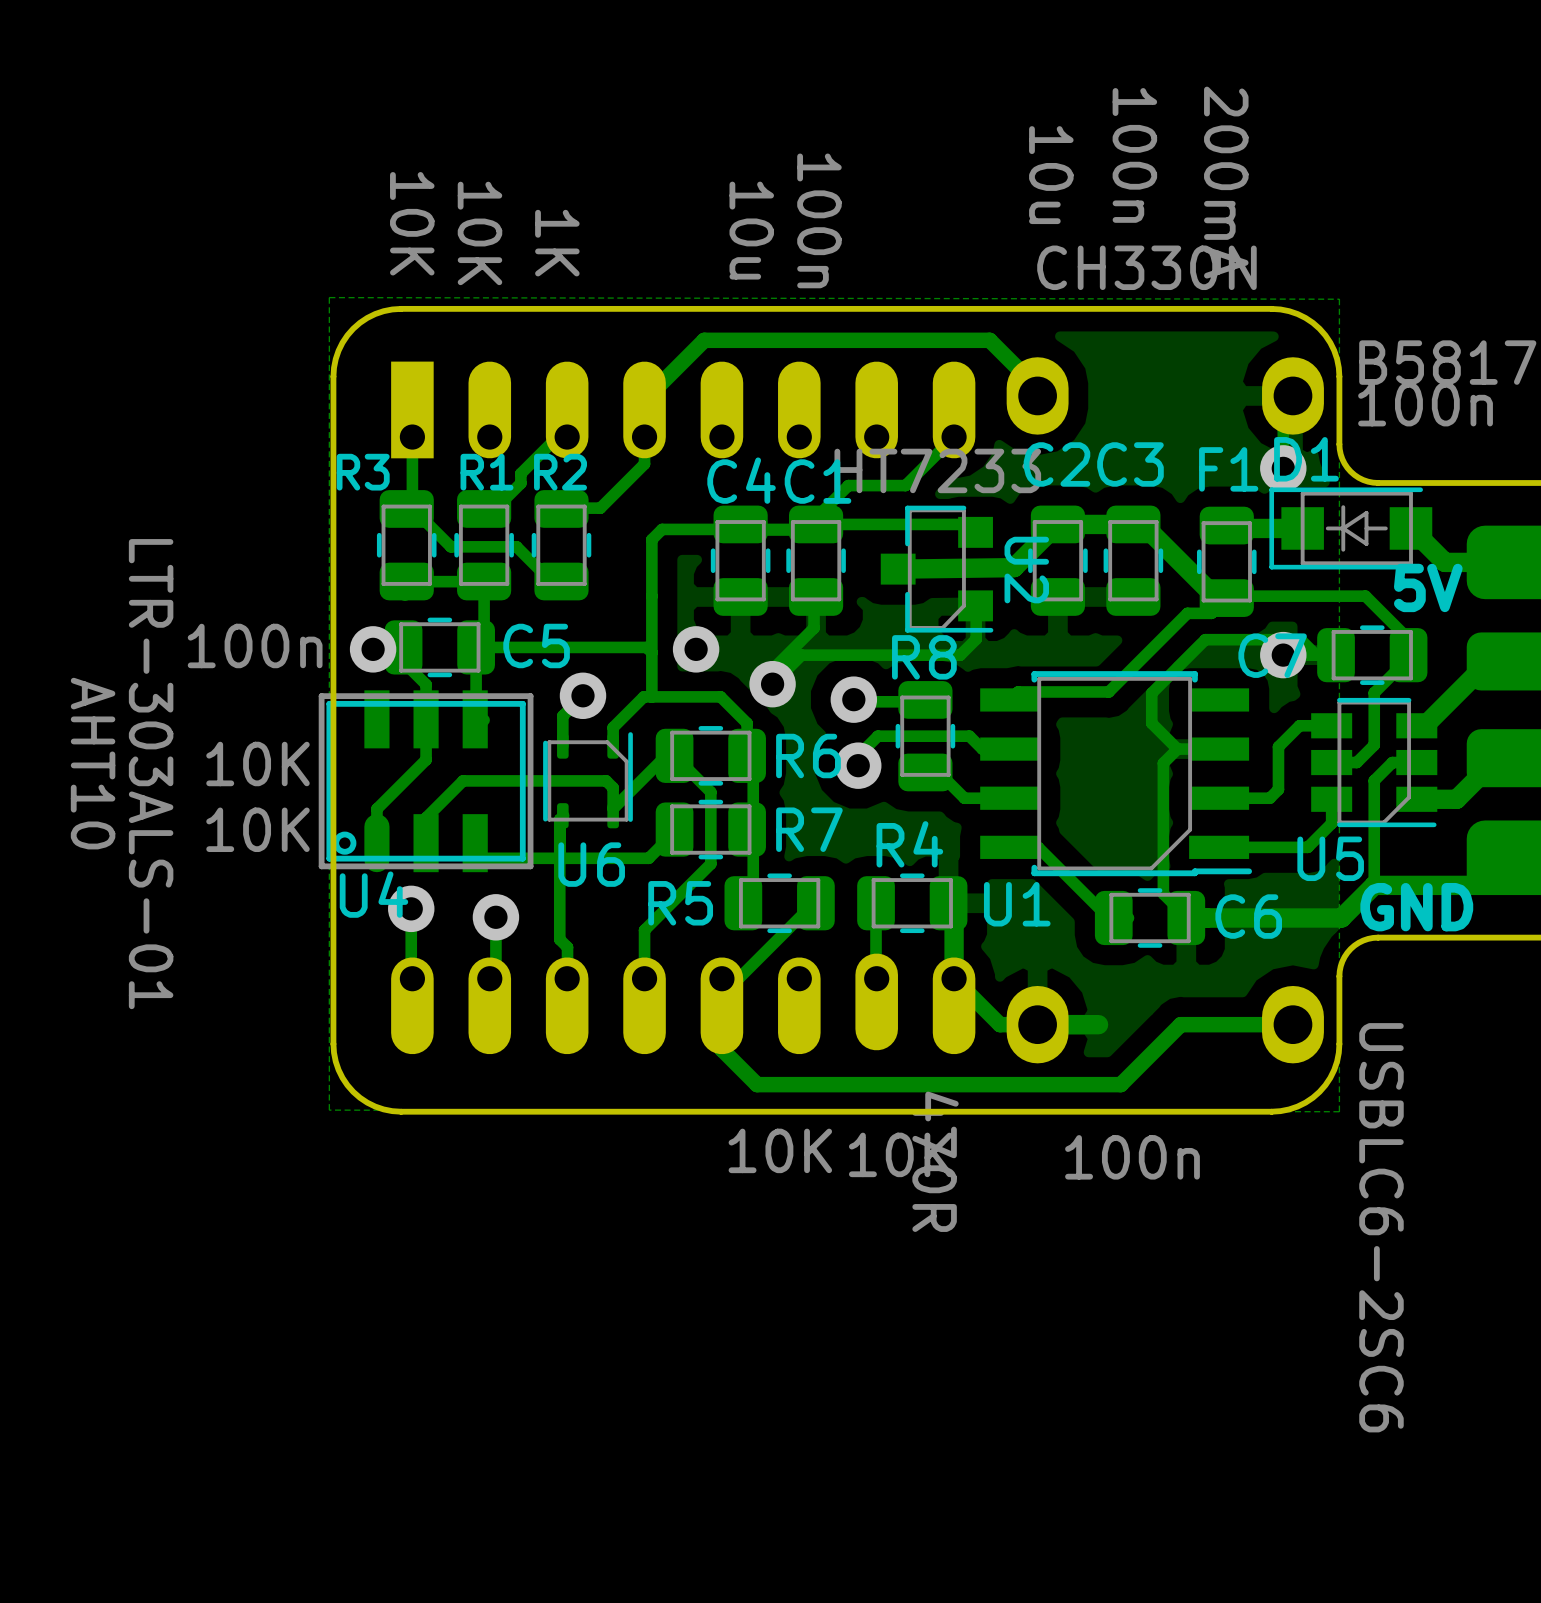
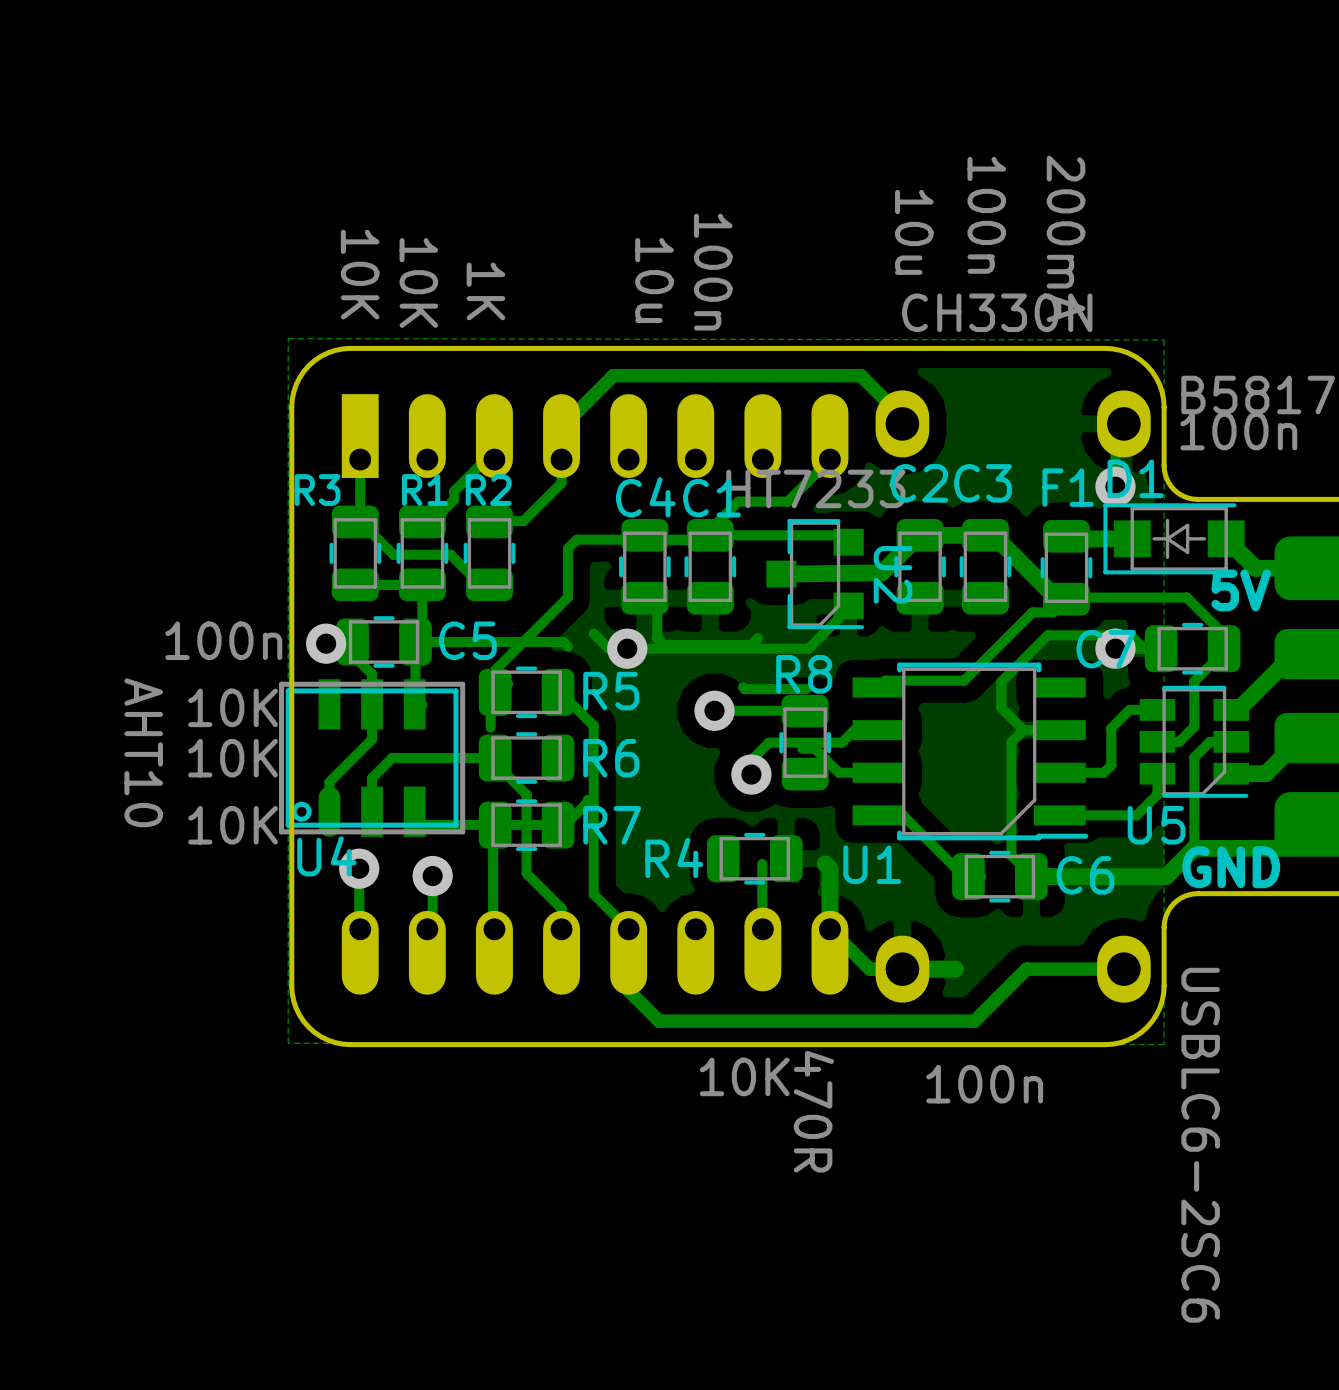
track: (651, 596) (651, 696) -> (567, 597) (495, 669) (495, 687)
track: (814, 598) (814, 628) (772, 669) (772, 684) (801, 655) -> (593, 633) (608, 648) (697, 648)
track: none -> (657, 607) (657, 638) (663, 644) (751, 644) (757, 638)
track: (976, 608) (976, 639) (960, 655) (929, 655) -> (849, 608) (808, 648)
via position: (696, 649) -> (627, 648)
via: (772, 684) -> none
via: (583, 695) -> none
via: (853, 699) -> none
via: none -> (714, 710)
track: none -> (805, 710) (714, 710)
R8 position: (925, 736) -> (805, 742)
track: (613, 746) (613, 727) (643, 696) (720, 696) (747, 723) (747, 755) (753, 761) (753, 823) (747, 829) (753, 835) (753, 893) (743, 903) -> none
track: (982, 749) (969, 736) (877, 736) (858, 755) (858, 765) -> (854, 730) (842, 742) (769, 742) (751, 760) (751, 774)
R6 position: (710, 755) -> (526, 758)
U4 value position: AHT10 (93, 763) -> AHT10 (143, 752)
R6 value position: 10K (257, 763) -> 10K (233, 758)
via: (858, 765) -> none
U6: LTR-303ALS-01 (587, 780) -> none
track: none -> (486, 758) (392, 758) (372, 778) (372, 789)
via: none -> (751, 774)
track: (563, 815) (559, 819) (559, 939) (567, 947) (567, 978) -> (493, 825) (494, 929)
track: (426, 817) (463, 780) (606, 780) (613, 787) (613, 808) (666, 755) (674, 755) (710, 792) (710, 863) (644, 930) (644, 954) -> (493, 758) (493, 761) (526, 794) (526, 873) (561, 908)
R7 value position: 10K (257, 829) -> 10K (233, 825)
R7 position: (710, 829) -> (526, 825)
R4 name position: R4 (909, 844) -> R4 (674, 858)
R5 name position: R5 (680, 903) -> R5 (611, 691)
R5 position: (779, 903) -> (526, 692)
track: (815, 903) (738, 978) (721, 978) -> (560, 692) (593, 725) (593, 894) (628, 929)
R4 position: (912, 903) -> (754, 858)
U1 name position: U1 (1017, 904) -> U1 (872, 864)
R5 value position: 10K (780, 1150) -> 10K (233, 707)

